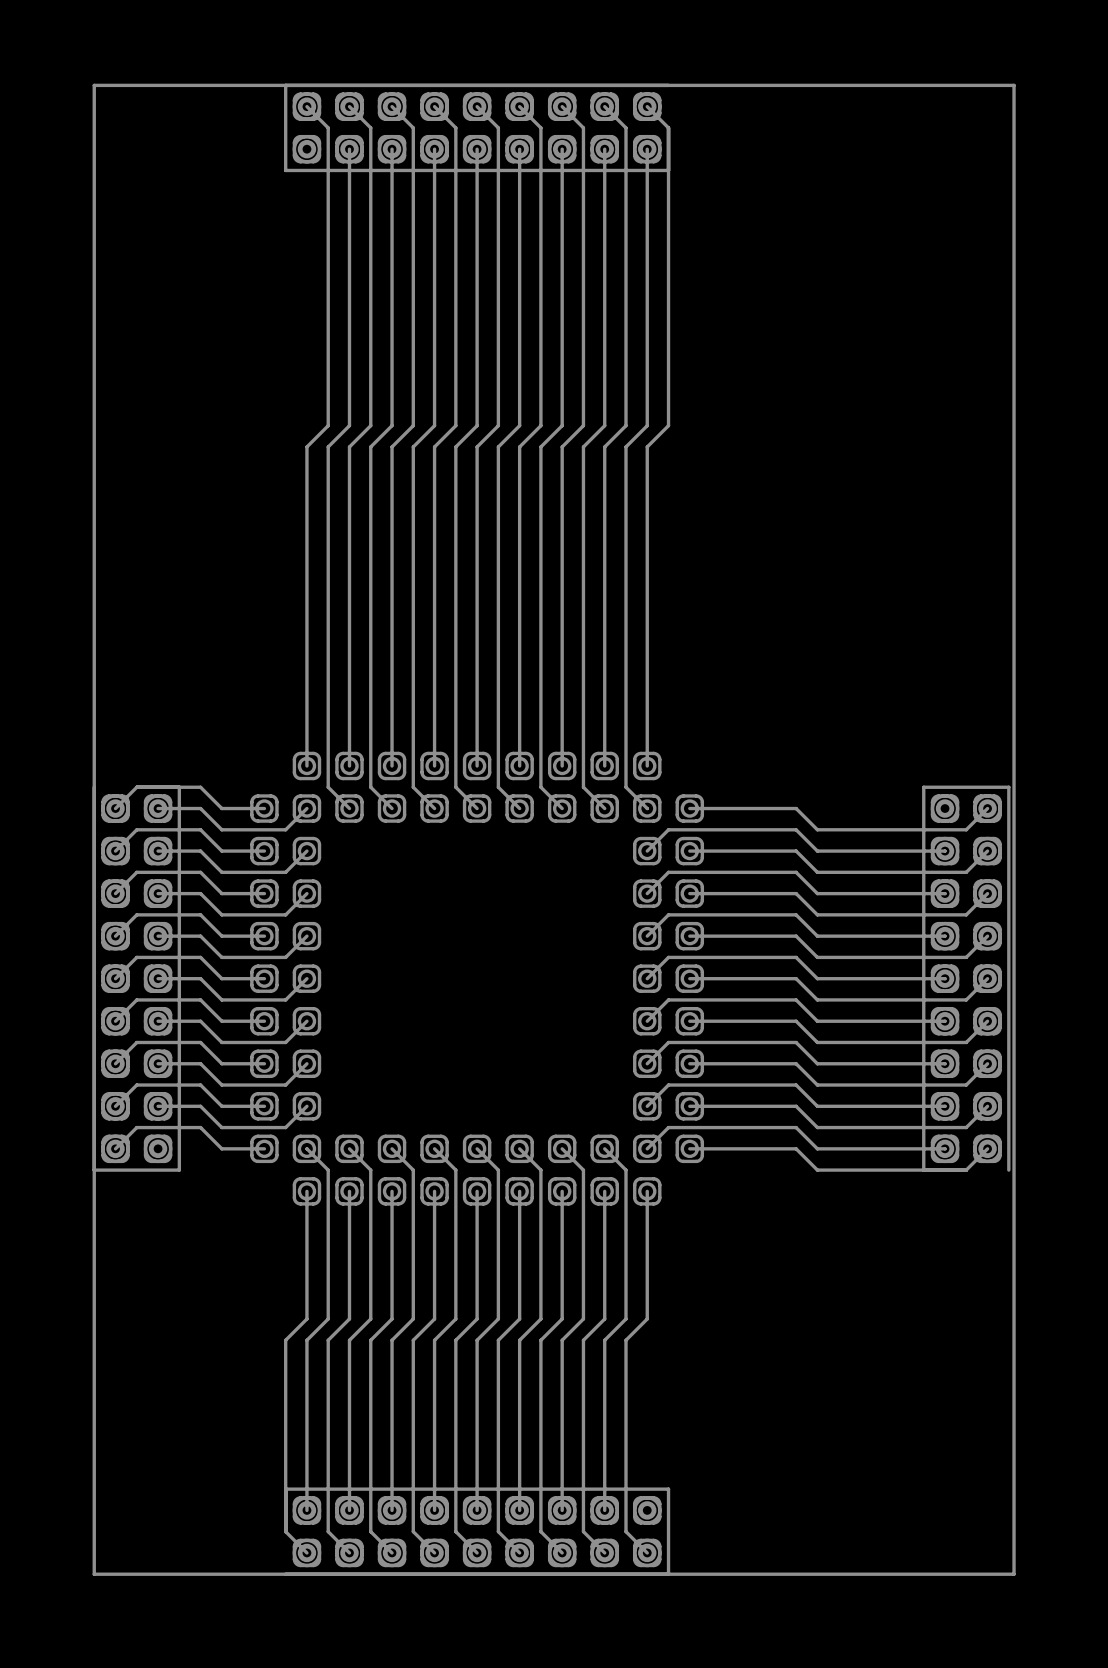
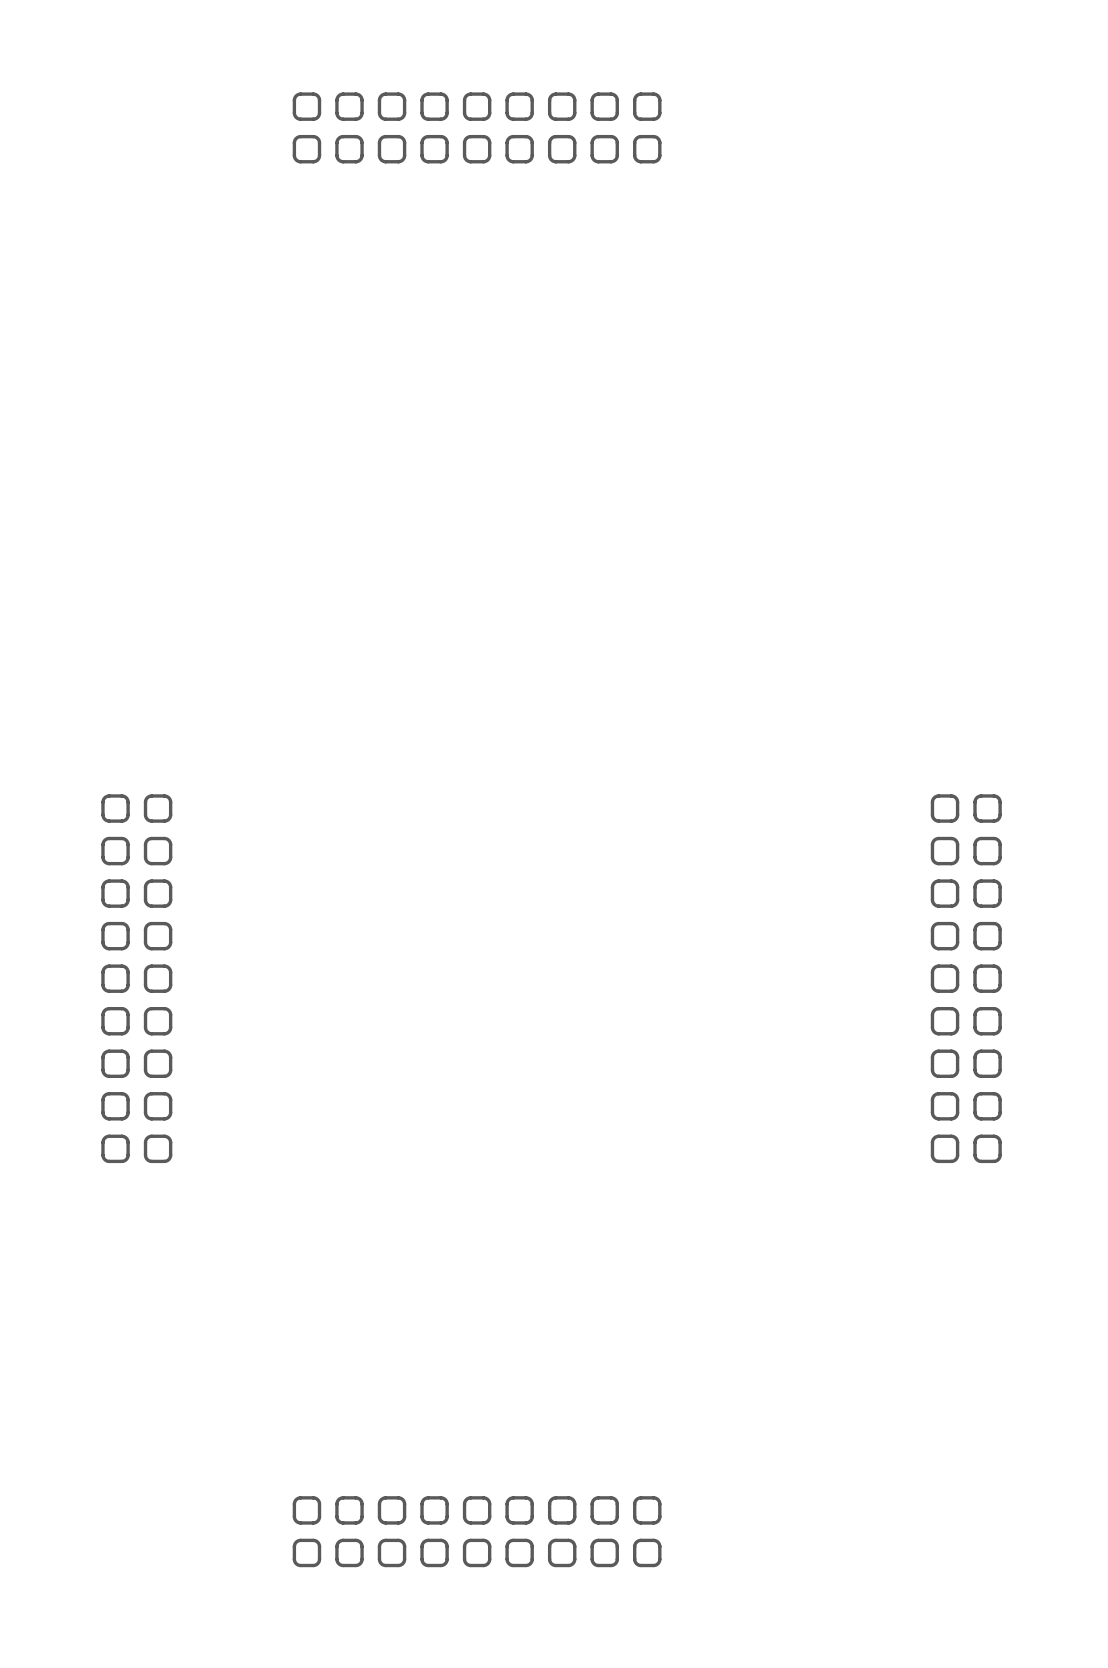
line: (94, 85) (1014, 85) (1014, 1574) (94, 1574) (94, 85) -> none
line: (285, 85) (285, 170) (668, 170) -> none
drawing: [292, 92, 662, 164] -> none
line: (306, 106) (328, 127) (328, 425) (306, 446) (306, 765) -> none
line: (349, 106) (370, 127) (370, 425) (349, 446) (349, 765) -> none
line: (392, 106) (413, 127) (413, 425) (392, 446) (392, 765) -> none
line: (434, 106) (455, 127) (455, 425) (434, 446) (434, 765) -> none
line: (477, 106) (498, 127) (498, 425) (477, 446) (477, 765) -> none
line: (519, 106) (540, 127) (540, 425) (519, 446) (519, 765) -> none
line: (562, 106) (583, 127) (583, 425) (562, 446) (562, 765) -> none
line: (604, 106) (625, 127) (625, 425) (604, 446) (604, 765) -> none
line: (647, 106) (668, 127) (668, 425) (647, 446) (647, 765) -> none
line: (349, 149) (349, 425) (328, 446) (328, 787) (349, 808) -> none
line: (392, 149) (392, 425) (370, 446) (370, 787) (392, 808) -> none
line: (434, 149) (434, 425) (413, 446) (413, 787) (434, 808) -> none
line: (477, 149) (477, 425) (455, 446) (455, 787) (477, 808) -> none
line: (519, 149) (519, 425) (498, 446) (498, 787) (519, 808) -> none
line: (562, 149) (562, 425) (540, 446) (540, 787) (562, 808) -> none
line: (604, 149) (604, 425) (583, 446) (583, 787) (604, 808) -> none
line: (647, 149) (647, 425) (625, 446) (625, 787) (647, 808) -> none
line: (300, 753) (314, 753) (318, 756) (319, 773) (316, 777) (299, 778) (295, 775) (294, 758) (300, 753) -> none
line: (343, 753) (356, 753) (361, 756) (362, 773) (358, 777) (342, 778) (337, 775) (337, 758) (343, 753) -> none
line: (385, 753) (399, 753) (403, 756) (404, 773) (401, 777) (384, 778) (380, 775) (379, 758) (385, 753) -> none
line: (428, 753) (441, 753) (446, 756) (447, 773) (443, 777) (427, 778) (422, 775) (422, 758) (428, 753) -> none
line: (470, 753) (484, 753) (488, 756) (489, 773) (486, 777) (470, 778) (465, 775) (464, 758) (470, 753) -> none
line: (513, 753) (526, 753) (531, 756) (532, 773) (529, 777) (512, 778) (507, 775) (507, 758) (513, 753) -> none
line: (555, 753) (569, 753) (573, 756) (574, 773) (571, 777) (555, 778) (550, 775) (549, 758) (555, 753) -> none
line: (598, 753) (611, 753) (616, 756) (617, 773) (614, 777) (597, 778) (593, 775) (592, 758) (598, 753) -> none
line: (640, 753) (654, 753) (658, 756) (659, 773) (656, 777) (640, 778) (635, 775) (634, 758) (640, 753) -> none
drawing: [297, 756, 317, 776] -> none
drawing: [340, 756, 359, 776] -> none
drawing: [382, 756, 402, 776] -> none
drawing: [425, 756, 444, 776] -> none
drawing: [467, 756, 487, 776] -> none
drawing: [510, 756, 529, 776] -> none
drawing: [552, 756, 572, 776] -> none
drawing: [595, 756, 614, 776] -> none
drawing: [638, 756, 657, 776] -> none
line: (179, 787) (179, 1170) (94, 1170) -> none
drawing: [101, 794, 173, 1164] -> none
drawing: [930, 794, 1002, 1164] -> none
line: (258, 795) (271, 796) (276, 799) (276, 815) (273, 820) (257, 821) (252, 817) (252, 800) (258, 795) -> none
line: (300, 795) (314, 796) (318, 799) (319, 815) (316, 820) (299, 821) (295, 817) (294, 800) (300, 795) -> none
line: (343, 795) (356, 796) (361, 799) (362, 815) (358, 820) (342, 821) (337, 817) (337, 800) (343, 795) -> none
line: (385, 795) (399, 796) (403, 799) (404, 815) (401, 820) (384, 821) (380, 817) (379, 800) (385, 795) -> none
line: (428, 795) (441, 796) (446, 799) (447, 815) (443, 820) (427, 821) (422, 817) (422, 800) (428, 795) -> none
line: (470, 795) (484, 796) (488, 799) (489, 815) (486, 820) (470, 821) (465, 817) (464, 800) (470, 795) -> none
line: (513, 795) (526, 796) (531, 799) (532, 815) (529, 820) (512, 821) (507, 817) (507, 800) (513, 795) -> none
line: (555, 795) (569, 796) (573, 799) (574, 815) (571, 820) (555, 821) (550, 817) (549, 800) (555, 795) -> none
line: (598, 795) (611, 796) (616, 799) (617, 815) (614, 820) (597, 821) (593, 817) (592, 800) (598, 795) -> none
line: (640, 795) (654, 796) (658, 799) (659, 815) (656, 820) (640, 821) (635, 817) (634, 800) (640, 795) -> none
line: (683, 795) (696, 796) (701, 799) (702, 815) (699, 820) (682, 821) (678, 817) (677, 800) (683, 795) -> none
drawing: [255, 799, 274, 818] -> none
drawing: [297, 799, 317, 818] -> none
drawing: [340, 799, 359, 818] -> none
drawing: [382, 799, 402, 818] -> none
drawing: [425, 799, 444, 818] -> none
drawing: [467, 799, 487, 818] -> none
drawing: [510, 799, 529, 818] -> none
drawing: [552, 799, 572, 818] -> none
drawing: [595, 799, 614, 818] -> none
drawing: [638, 799, 657, 818] -> none
drawing: [680, 799, 700, 818] -> none
line: (115, 808) (136, 787) (200, 787) (221, 808) (264, 808) -> none
line: (158, 808) (200, 808) (221, 829) (285, 829) (306, 808) -> none
line: (689, 808) (796, 808) (817, 829) (966, 829) (987, 808) -> none
line: (258, 838) (271, 838) (276, 841) (276, 858) (273, 862) (257, 863) (252, 860) (252, 843) (258, 838) -> none
line: (300, 838) (314, 838) (318, 841) (319, 858) (316, 862) (299, 863) (295, 860) (294, 843) (300, 838) -> none
line: (640, 838) (654, 838) (658, 841) (659, 858) (656, 862) (640, 863) (635, 860) (634, 843) (640, 838) -> none
line: (683, 838) (696, 838) (701, 841) (702, 858) (699, 862) (682, 863) (678, 860) (677, 843) (683, 838) -> none
drawing: [255, 841, 274, 861] -> none
drawing: [297, 841, 317, 861] -> none
drawing: [638, 841, 657, 861] -> none
drawing: [680, 841, 700, 861] -> none
line: (115, 851) (136, 829) (200, 829) (221, 851) (264, 851) -> none
line: (158, 851) (200, 851) (221, 872) (285, 872) (306, 851) -> none
line: (647, 851) (668, 829) (796, 829) (817, 851) (945, 851) -> none
line: (689, 851) (796, 851) (817, 872) (966, 872) (987, 851) -> none
line: (258, 881) (271, 881) (276, 884) (276, 900) (273, 905) (257, 906) (252, 903) (252, 885) (258, 881) -> none
line: (300, 881) (314, 881) (318, 884) (319, 900) (316, 905) (299, 906) (295, 903) (294, 885) (300, 881) -> none
line: (640, 881) (654, 881) (658, 884) (659, 900) (656, 905) (640, 906) (635, 903) (634, 885) (640, 881) -> none
line: (683, 881) (696, 881) (701, 884) (702, 900) (699, 905) (682, 906) (678, 903) (677, 885) (683, 881) -> none
drawing: [255, 884, 274, 903] -> none
drawing: [297, 884, 317, 903] -> none
drawing: [638, 884, 657, 903] -> none
drawing: [680, 884, 700, 903] -> none
line: (115, 893) (136, 872) (200, 872) (221, 893) (264, 893) -> none
line: (158, 893) (200, 893) (221, 914) (285, 914) (306, 893) -> none
line: (647, 893) (668, 872) (796, 872) (817, 893) (945, 893) -> none
line: (689, 893) (796, 893) (817, 914) (966, 914) (987, 893) -> none
line: (258, 923) (271, 923) (276, 926) (276, 943) (273, 947) (257, 948) (252, 945) (252, 928) (258, 923) -> none
line: (300, 923) (314, 923) (318, 926) (319, 943) (316, 947) (299, 948) (295, 945) (294, 928) (300, 923) -> none
line: (640, 923) (654, 923) (658, 926) (659, 943) (656, 947) (640, 948) (635, 945) (634, 928) (640, 923) -> none
line: (683, 923) (696, 923) (701, 926) (702, 943) (699, 947) (682, 948) (678, 945) (677, 928) (683, 923) -> none
drawing: [255, 926, 274, 946] -> none
drawing: [297, 926, 317, 946] -> none
drawing: [638, 926, 657, 946] -> none
drawing: [680, 926, 700, 946] -> none
line: (115, 936) (136, 914) (200, 914) (221, 936) (264, 936) -> none
line: (158, 936) (200, 936) (221, 957) (285, 957) (306, 936) -> none
line: (647, 936) (668, 914) (796, 914) (817, 936) (945, 936) -> none
line: (689, 936) (796, 936) (817, 957) (966, 957) (987, 936) -> none
line: (258, 966) (271, 966) (276, 969) (276, 985) (273, 990) (257, 991) (252, 988) (252, 970) (258, 966) -> none
line: (300, 966) (314, 966) (318, 969) (319, 985) (316, 990) (299, 991) (295, 988) (294, 970) (300, 966) -> none
line: (640, 966) (654, 966) (658, 969) (659, 985) (656, 990) (640, 991) (635, 988) (634, 970) (640, 966) -> none
line: (683, 966) (696, 966) (701, 969) (702, 985) (699, 990) (682, 991) (678, 988) (677, 970) (683, 966) -> none
drawing: [255, 969, 274, 988] -> none
drawing: [297, 969, 317, 988] -> none
drawing: [638, 969, 657, 988] -> none
drawing: [680, 969, 700, 988] -> none
line: (115, 978) (136, 957) (200, 957) (221, 978) (264, 978) -> none
line: (158, 978) (200, 978) (221, 999) (285, 999) (306, 978) -> none
line: (647, 978) (668, 957) (796, 957) (817, 978) (945, 978) -> none
line: (689, 978) (796, 978) (817, 999) (966, 999) (987, 978) -> none
line: (258, 1008) (271, 1008) (276, 1011) (276, 1028) (273, 1032) (257, 1033) (252, 1030) (252, 1013) (258, 1008) -> none
line: (300, 1008) (314, 1008) (318, 1011) (319, 1028) (316, 1032) (299, 1033) (295, 1030) (294, 1013) (300, 1008) -> none
line: (640, 1008) (654, 1008) (658, 1011) (659, 1028) (656, 1032) (640, 1033) (635, 1030) (634, 1013) (640, 1008) -> none
line: (683, 1008) (696, 1008) (701, 1011) (702, 1028) (699, 1032) (682, 1033) (678, 1030) (677, 1013) (683, 1008) -> none
drawing: [255, 1012, 274, 1031] -> none
drawing: [297, 1012, 317, 1031] -> none
drawing: [638, 1012, 657, 1031] -> none
drawing: [680, 1012, 700, 1031] -> none
line: (115, 1021) (136, 999) (200, 999) (221, 1021) (264, 1021) -> none
line: (158, 1021) (200, 1021) (221, 1042) (285, 1042) (306, 1021) -> none
line: (647, 1021) (668, 999) (796, 999) (817, 1021) (945, 1021) -> none
line: (689, 1021) (796, 1021) (817, 1042) (966, 1042) (987, 1021) -> none
line: (258, 1051) (271, 1051) (276, 1054) (276, 1070) (273, 1075) (257, 1076) (252, 1073) (252, 1055) (258, 1051) -> none
line: (300, 1051) (314, 1051) (318, 1054) (319, 1070) (316, 1075) (299, 1076) (295, 1073) (294, 1055) (300, 1051) -> none
line: (640, 1051) (654, 1051) (658, 1054) (659, 1070) (656, 1075) (640, 1076) (635, 1073) (634, 1055) (640, 1051) -> none
line: (683, 1051) (696, 1051) (701, 1054) (702, 1070) (699, 1075) (682, 1076) (678, 1073) (677, 1055) (683, 1051) -> none
drawing: [255, 1054, 274, 1073] -> none
drawing: [297, 1054, 317, 1073] -> none
drawing: [638, 1054, 657, 1073] -> none
drawing: [680, 1054, 700, 1073] -> none
line: (115, 1063) (136, 1042) (200, 1042) (221, 1063) (264, 1063) -> none
line: (158, 1063) (200, 1063) (221, 1085) (285, 1085) (306, 1063) -> none
line: (647, 1063) (668, 1042) (796, 1042) (817, 1063) (945, 1063) -> none
line: (689, 1063) (796, 1063) (817, 1085) (966, 1085) (987, 1063) -> none
line: (258, 1093) (271, 1093) (276, 1096) (276, 1113) (273, 1118) (257, 1118) (252, 1115) (252, 1098) (258, 1093) -> none
line: (300, 1093) (314, 1093) (318, 1096) (319, 1113) (316, 1118) (299, 1118) (295, 1115) (294, 1098) (300, 1093) -> none
line: (640, 1093) (654, 1093) (658, 1096) (659, 1113) (656, 1118) (640, 1118) (635, 1115) (634, 1098) (640, 1093) -> none
line: (683, 1093) (696, 1093) (701, 1096) (702, 1113) (699, 1118) (682, 1118) (678, 1115) (677, 1098) (683, 1093) -> none
drawing: [255, 1097, 274, 1116] -> none
drawing: [297, 1097, 317, 1116] -> none
drawing: [638, 1097, 657, 1116] -> none
drawing: [680, 1097, 700, 1116] -> none
line: (115, 1106) (136, 1085) (200, 1085) (221, 1106) (264, 1106) -> none
line: (158, 1106) (200, 1106) (221, 1127) (285, 1127) (306, 1106) -> none
line: (647, 1106) (668, 1085) (796, 1085) (817, 1106) (945, 1106) -> none
line: (689, 1106) (796, 1106) (817, 1127) (966, 1127) (987, 1106) -> none
line: (258, 1136) (271, 1136) (276, 1139) (276, 1155) (273, 1160) (257, 1161) (252, 1158) (252, 1140) (258, 1136) -> none
line: (300, 1136) (314, 1136) (318, 1139) (319, 1155) (316, 1160) (299, 1161) (295, 1158) (294, 1140) (300, 1136) -> none
line: (343, 1136) (356, 1136) (361, 1139) (362, 1155) (358, 1160) (342, 1161) (337, 1158) (337, 1140) (343, 1136) -> none
line: (385, 1136) (399, 1136) (403, 1139) (404, 1155) (401, 1160) (384, 1161) (380, 1158) (379, 1140) (385, 1136) -> none
line: (428, 1136) (441, 1136) (446, 1139) (447, 1155) (443, 1160) (427, 1161) (422, 1158) (422, 1140) (428, 1136) -> none
line: (470, 1136) (484, 1136) (488, 1139) (489, 1155) (486, 1160) (470, 1161) (465, 1158) (464, 1140) (470, 1136) -> none
line: (513, 1136) (526, 1136) (531, 1139) (532, 1155) (529, 1160) (512, 1161) (507, 1158) (507, 1140) (513, 1136) -> none
line: (555, 1136) (569, 1136) (573, 1139) (574, 1155) (571, 1160) (555, 1161) (550, 1158) (549, 1140) (555, 1136) -> none
line: (598, 1136) (611, 1136) (616, 1139) (617, 1155) (614, 1160) (597, 1161) (593, 1158) (592, 1140) (598, 1136) -> none
line: (640, 1136) (654, 1136) (658, 1139) (659, 1155) (656, 1160) (640, 1161) (635, 1158) (634, 1140) (640, 1136) -> none
line: (683, 1136) (696, 1136) (701, 1139) (702, 1155) (699, 1160) (682, 1161) (678, 1158) (677, 1140) (683, 1136) -> none
drawing: [255, 1139, 274, 1159] -> none
drawing: [297, 1139, 317, 1159] -> none
drawing: [340, 1139, 359, 1159] -> none
drawing: [382, 1139, 402, 1159] -> none
drawing: [425, 1139, 444, 1159] -> none
drawing: [467, 1139, 487, 1159] -> none
drawing: [510, 1139, 529, 1159] -> none
drawing: [552, 1139, 572, 1159] -> none
drawing: [595, 1139, 614, 1159] -> none
drawing: [638, 1139, 657, 1159] -> none
drawing: [680, 1139, 700, 1159] -> none
line: (115, 1148) (136, 1127) (200, 1127) (221, 1148) (264, 1148) -> none
line: (306, 1148) (328, 1170) (328, 1318) (306, 1340) (306, 1510) -> none
line: (349, 1148) (370, 1170) (370, 1318) (349, 1340) (349, 1510) -> none
line: (392, 1148) (413, 1170) (413, 1318) (392, 1340) (392, 1510) -> none
line: (434, 1148) (455, 1170) (455, 1318) (434, 1340) (434, 1510) -> none
line: (477, 1148) (498, 1170) (498, 1318) (477, 1340) (477, 1510) -> none
line: (519, 1148) (540, 1170) (540, 1318) (519, 1340) (519, 1510) -> none
line: (562, 1148) (583, 1170) (583, 1318) (562, 1340) (562, 1510) -> none
line: (604, 1148) (625, 1170) (625, 1318) (604, 1340) (604, 1510) -> none
line: (647, 1148) (668, 1127) (796, 1127) (817, 1148) (945, 1148) -> none
line: (689, 1148) (796, 1148) (817, 1170) (966, 1170) (987, 1148) -> none
line: (923, 1170) (923, 787) (1008, 787) (1008, 1170) -> none
line: (300, 1178) (314, 1178) (318, 1181) (319, 1198) (316, 1203) (299, 1203) (295, 1200) (294, 1183) (300, 1178) -> none
line: (343, 1178) (356, 1178) (361, 1181) (362, 1198) (358, 1203) (342, 1203) (337, 1200) (337, 1183) (343, 1178) -> none
line: (385, 1178) (399, 1178) (403, 1181) (404, 1198) (401, 1203) (384, 1203) (380, 1200) (379, 1183) (385, 1178) -> none
line: (428, 1178) (441, 1178) (446, 1181) (447, 1198) (443, 1203) (427, 1203) (422, 1200) (422, 1183) (428, 1178) -> none
line: (470, 1178) (484, 1178) (488, 1181) (489, 1198) (486, 1203) (470, 1203) (465, 1200) (464, 1183) (470, 1178) -> none
line: (513, 1178) (526, 1178) (531, 1181) (532, 1198) (529, 1203) (512, 1203) (507, 1200) (507, 1183) (513, 1178) -> none
line: (555, 1178) (569, 1178) (573, 1181) (574, 1198) (571, 1203) (555, 1203) (550, 1200) (549, 1183) (555, 1178) -> none
line: (598, 1178) (611, 1178) (616, 1181) (617, 1198) (614, 1203) (597, 1203) (593, 1200) (592, 1183) (598, 1178) -> none
line: (640, 1178) (654, 1178) (658, 1181) (659, 1198) (656, 1203) (640, 1203) (635, 1200) (634, 1183) (640, 1178) -> none
drawing: [297, 1182, 317, 1201] -> none
drawing: [340, 1182, 359, 1201] -> none
drawing: [382, 1182, 402, 1201] -> none
drawing: [425, 1182, 444, 1201] -> none
drawing: [467, 1182, 487, 1201] -> none
drawing: [510, 1182, 529, 1201] -> none
drawing: [552, 1182, 572, 1201] -> none
drawing: [595, 1182, 614, 1201] -> none
drawing: [638, 1182, 657, 1201] -> none
line: (306, 1191) (306, 1318) (285, 1340) (285, 1531) (306, 1552) -> none
line: (349, 1191) (349, 1318) (328, 1340) (328, 1531) (349, 1552) -> none
line: (392, 1191) (392, 1318) (370, 1340) (370, 1531) (392, 1552) -> none
line: (434, 1191) (434, 1318) (413, 1340) (413, 1531) (434, 1552) -> none
line: (477, 1191) (477, 1318) (455, 1340) (455, 1531) (477, 1552) -> none
line: (519, 1191) (519, 1318) (498, 1340) (498, 1531) (519, 1552) -> none
line: (562, 1191) (562, 1318) (540, 1340) (540, 1531) (562, 1552) -> none
line: (604, 1191) (604, 1318) (583, 1340) (583, 1531) (604, 1552) -> none
line: (647, 1191) (647, 1318) (625, 1340) (625, 1531) (647, 1552) -> none
line: (285, 1489) (668, 1489) (668, 1574) -> none
drawing: [292, 1496, 662, 1568] -> none

